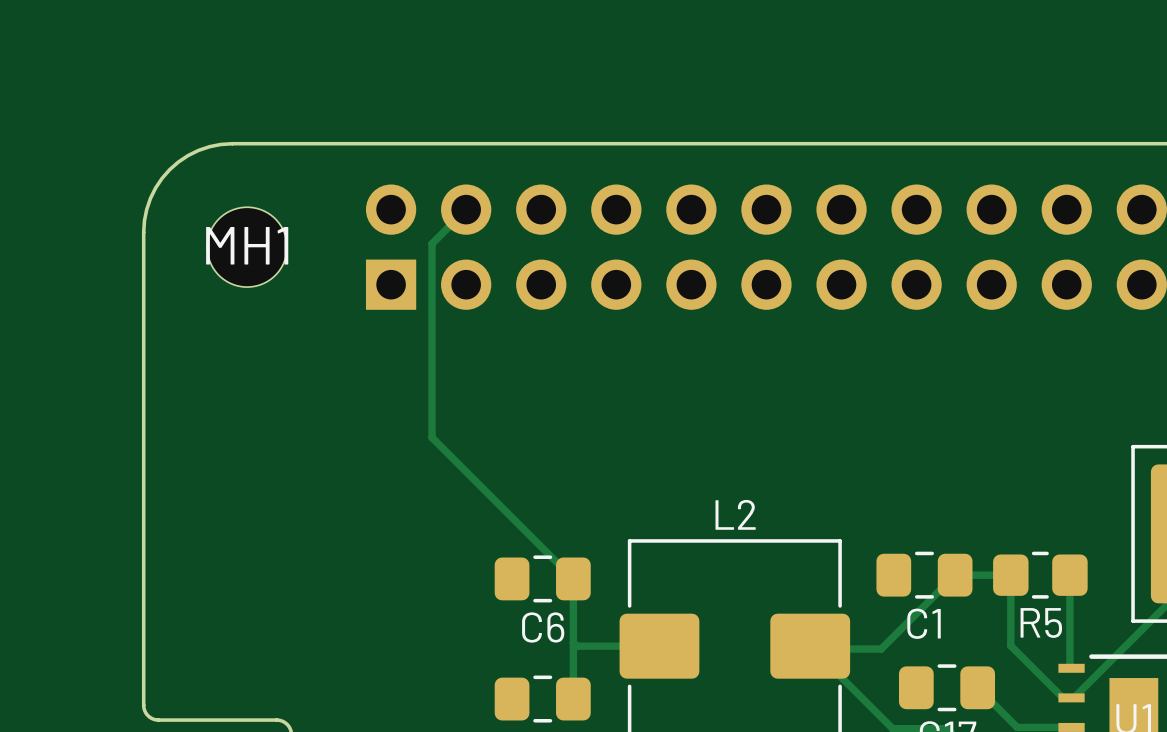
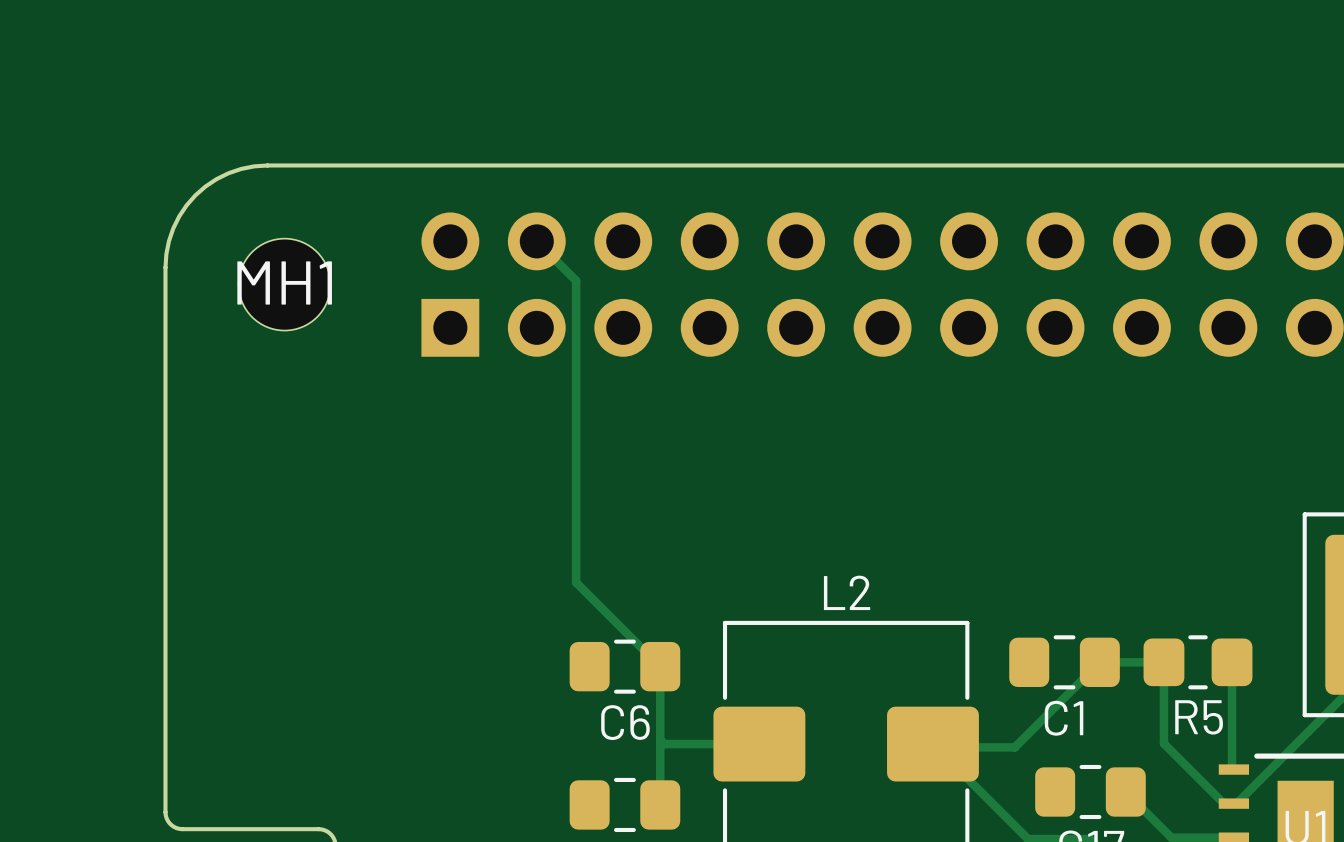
track: (466, 209) (432, 243) (432, 437) (500, 505) -> (536, 241) (576, 280) (576, 582)

